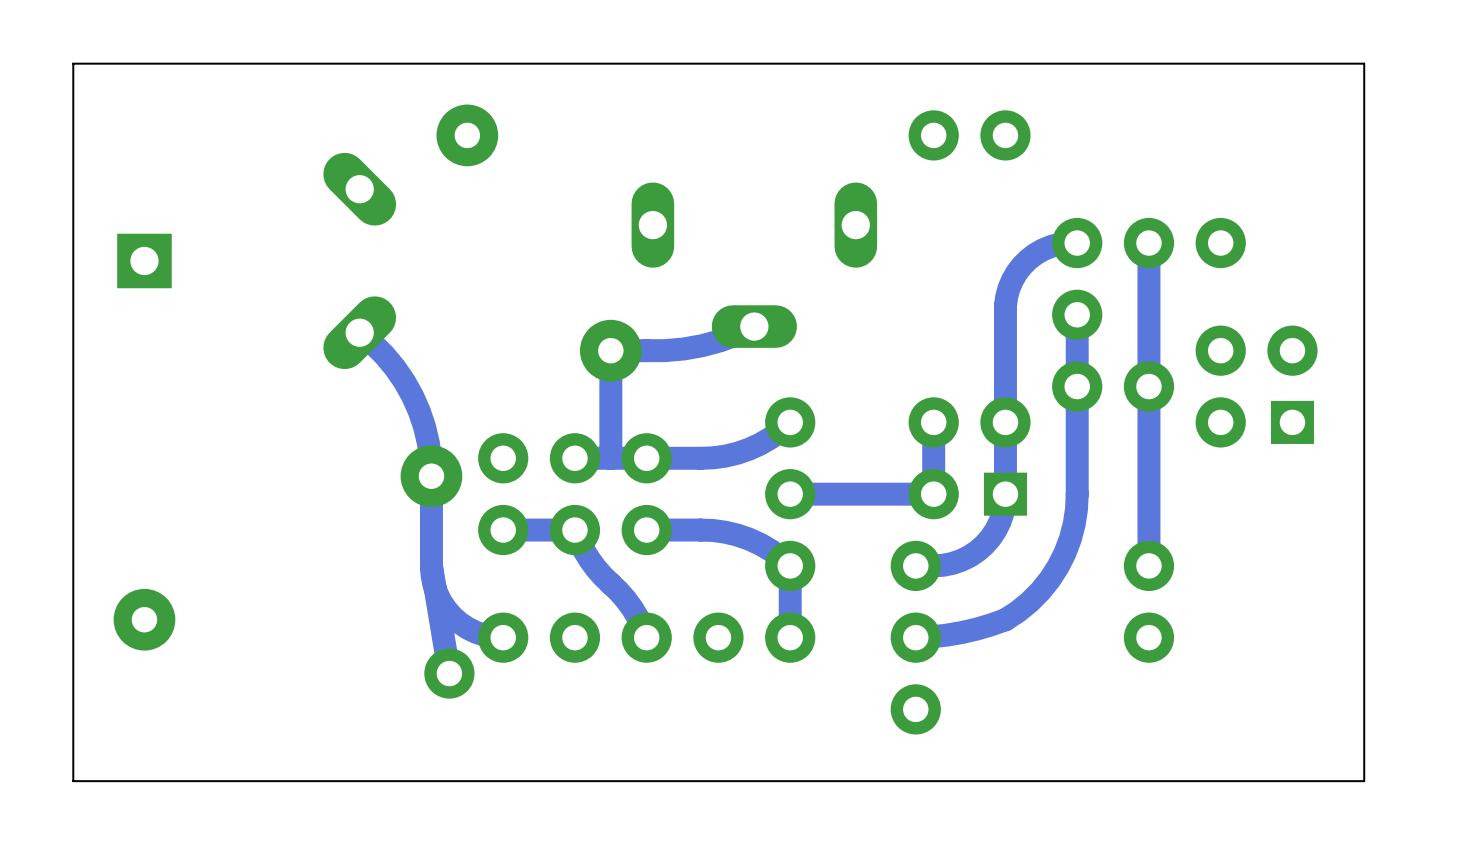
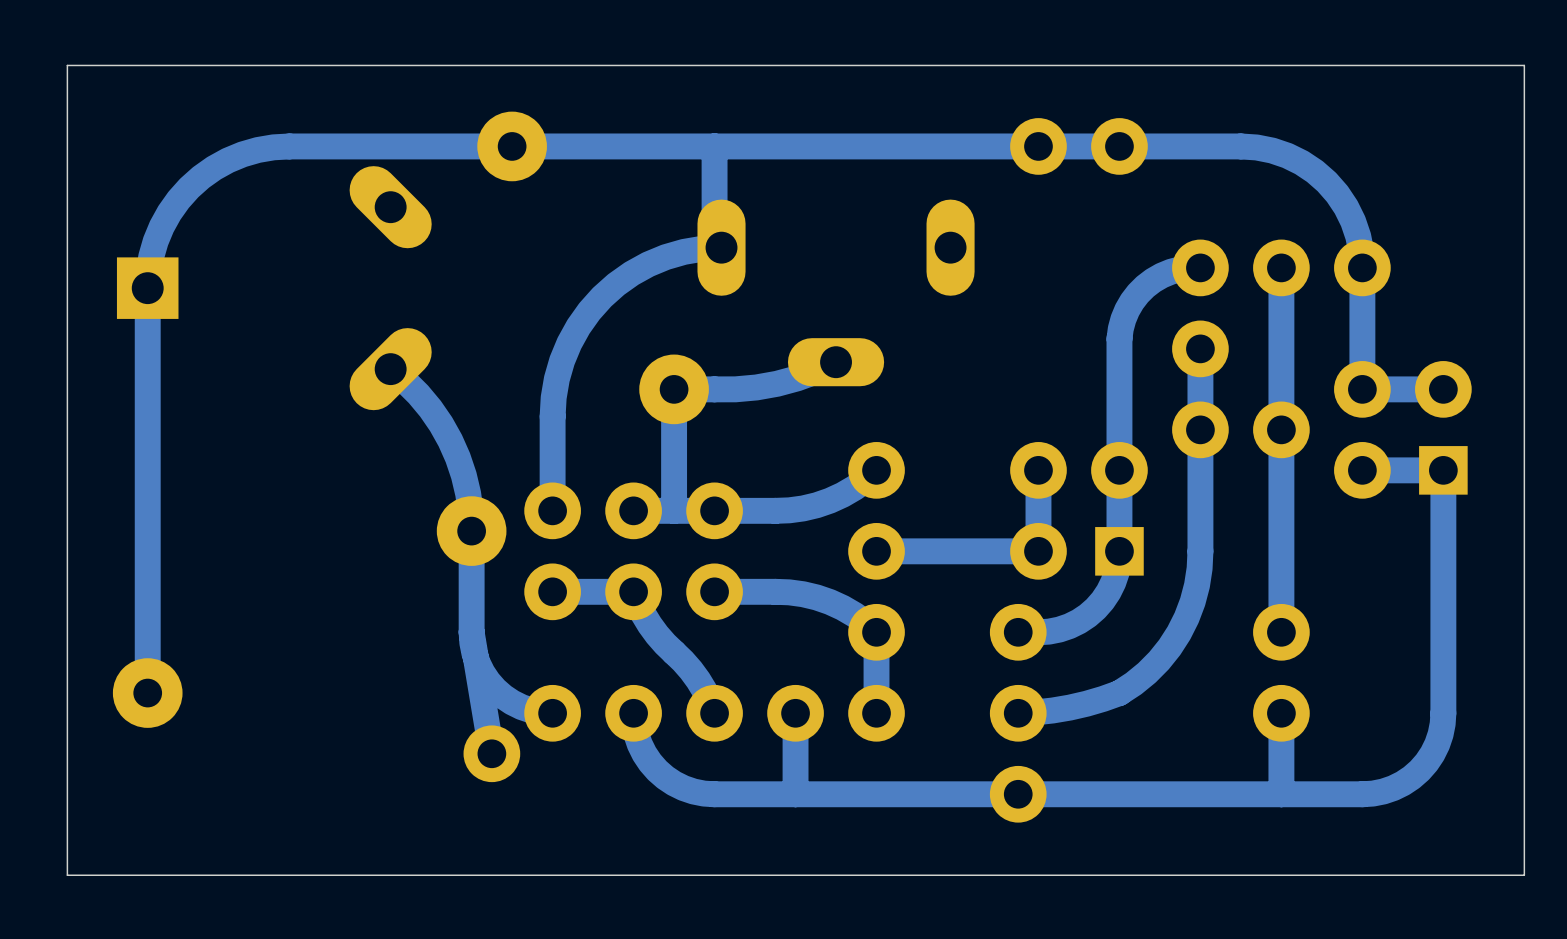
bottom track: none -> (714, 146) (714, 241) (717, 246) (721, 247) (702, 248) (665, 257) (631, 273) (602, 297) (578, 326) (569, 343) (562, 360) (553, 397) (552, 510)
bottom track: none -> (1443, 389) (1362, 389) (1362, 267) (1358, 236) (1353, 221) (1346, 207) (1326, 182) (1301, 162) (1272, 150) (1240, 146) (289, 146) (257, 149) (227, 160) (214, 168) (189, 187) (169, 212) (155, 241) (151, 256) (147, 288) (147, 693)
bottom track: none -> (1362, 470) (1443, 470) (1442, 723) (1432, 753) (1419, 770) (1402, 783) (1383, 791) (1362, 794) (704, 793) (683, 788) (657, 770) (639, 744) (633, 713)
bottom track: none -> (795, 713) (795, 794)
bottom track: none -> (1281, 713) (1281, 794)

